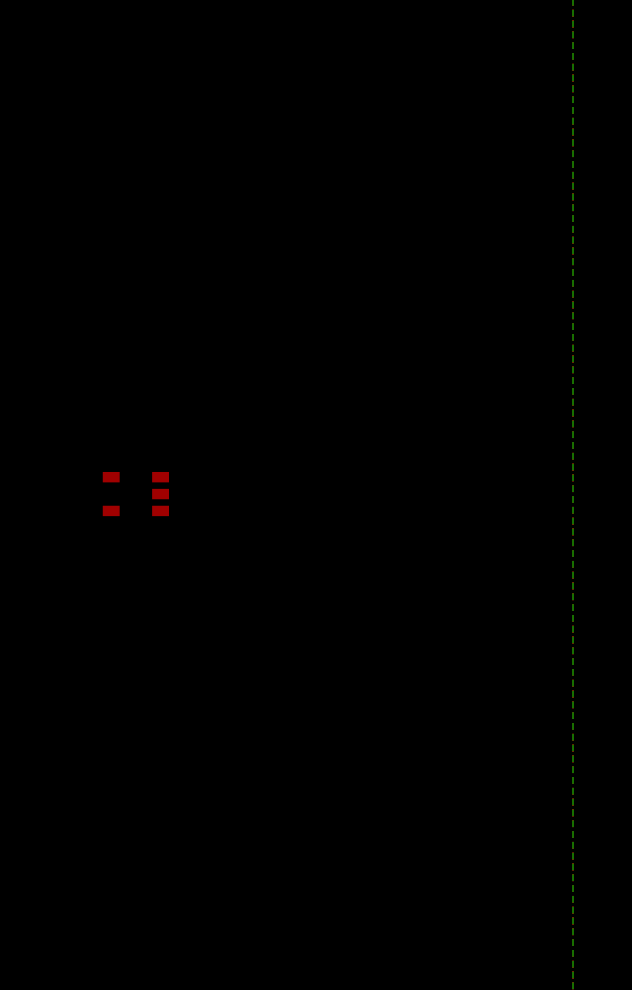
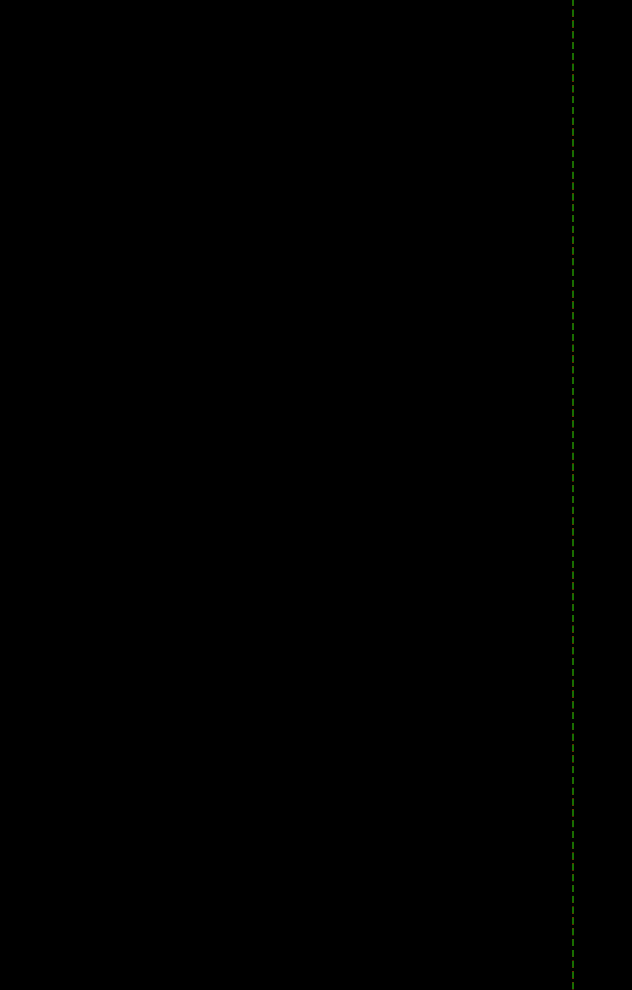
part: (135, 494) -> none

